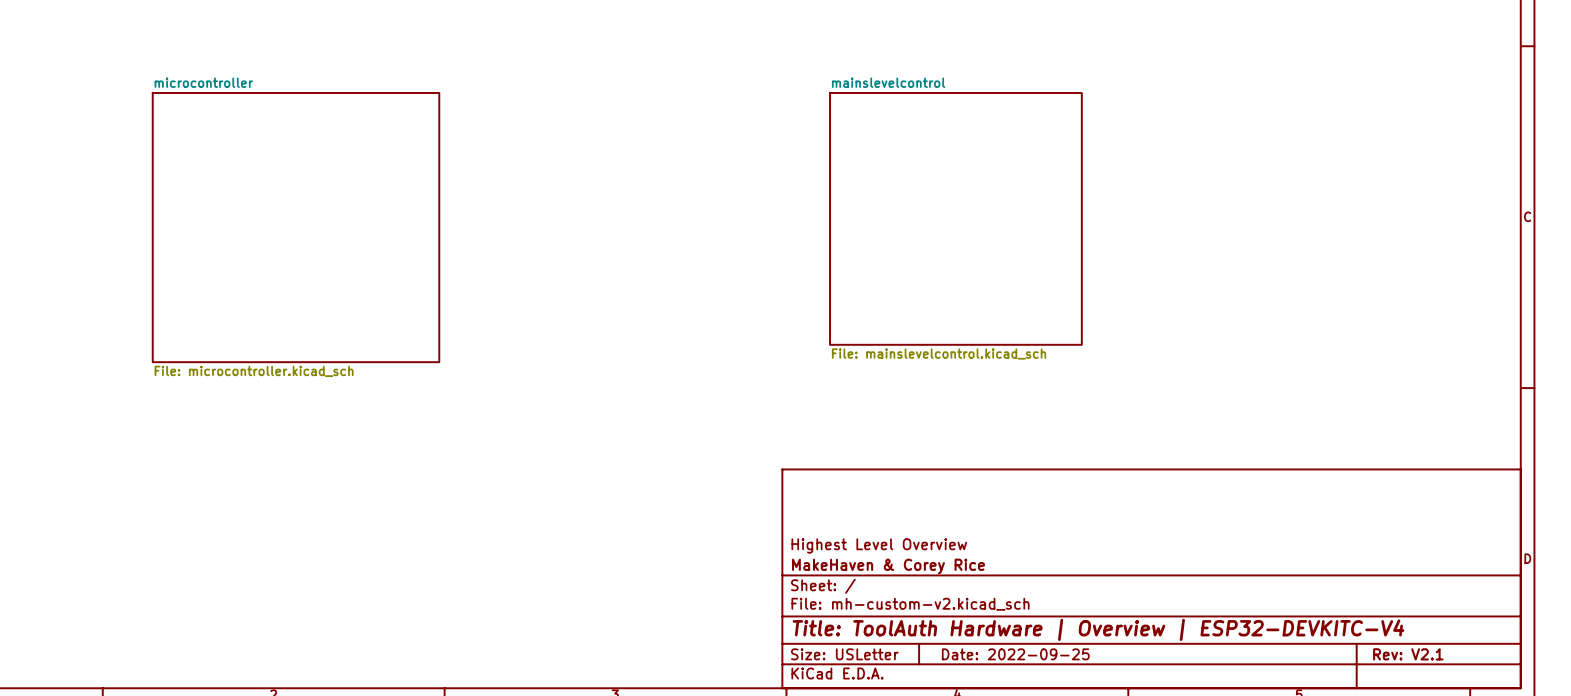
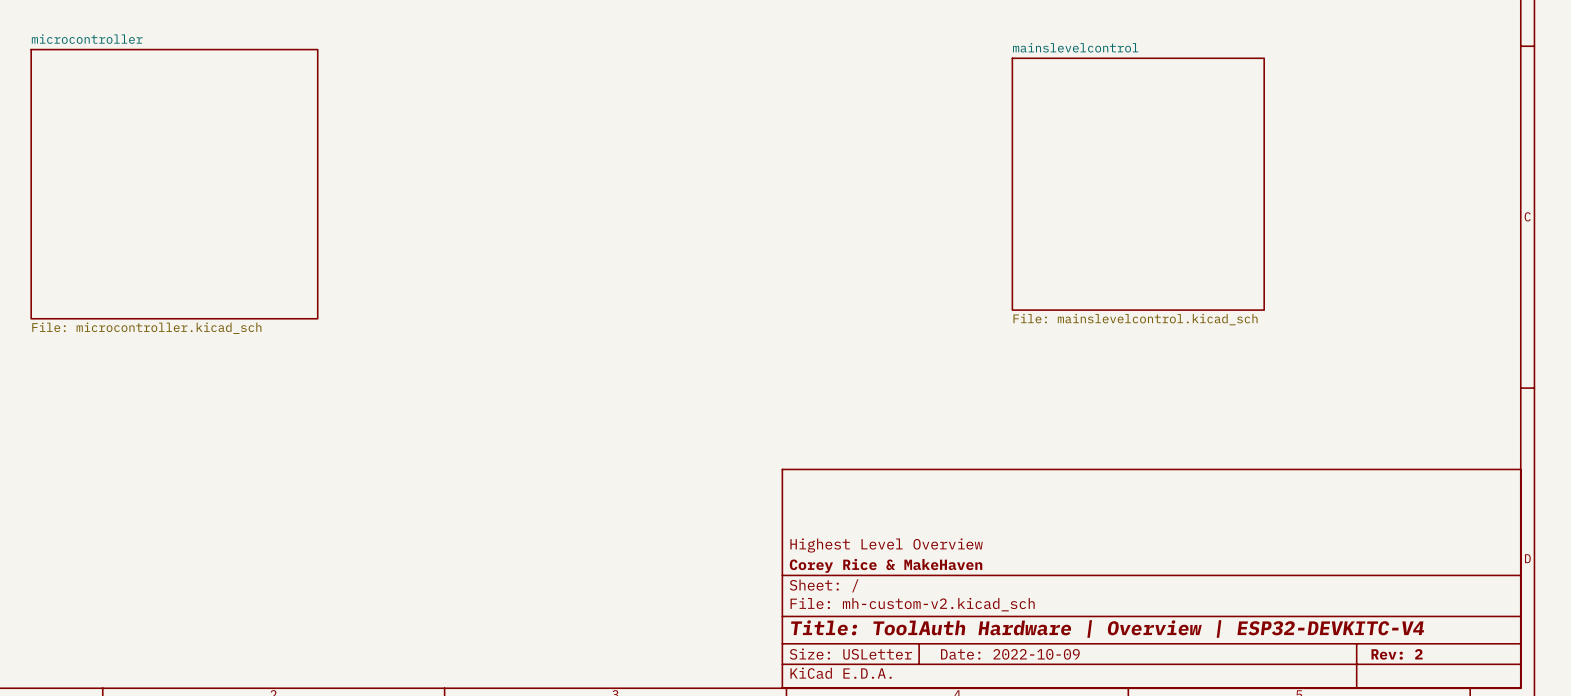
sheet mainslevelcontrol: none -> File: mainslevelcontrol.kicad_sch (1138, 184)
sheet mainslevelcontrol: File: mainslevelcontrol.kicad_sch (955, 218) -> none
sheet microcontroller position: (296, 227) -> (174, 184)
title block: MakeHaven & Corey Rice (888, 566) -> Corey Rice & MakeHaven (886, 565)
title block: Date: 2022-09-25 (1015, 654) -> Date: 2022-10-09 (1010, 654)
title block: Rev: V2.1 (1408, 654) -> Rev: 2 (1397, 654)

